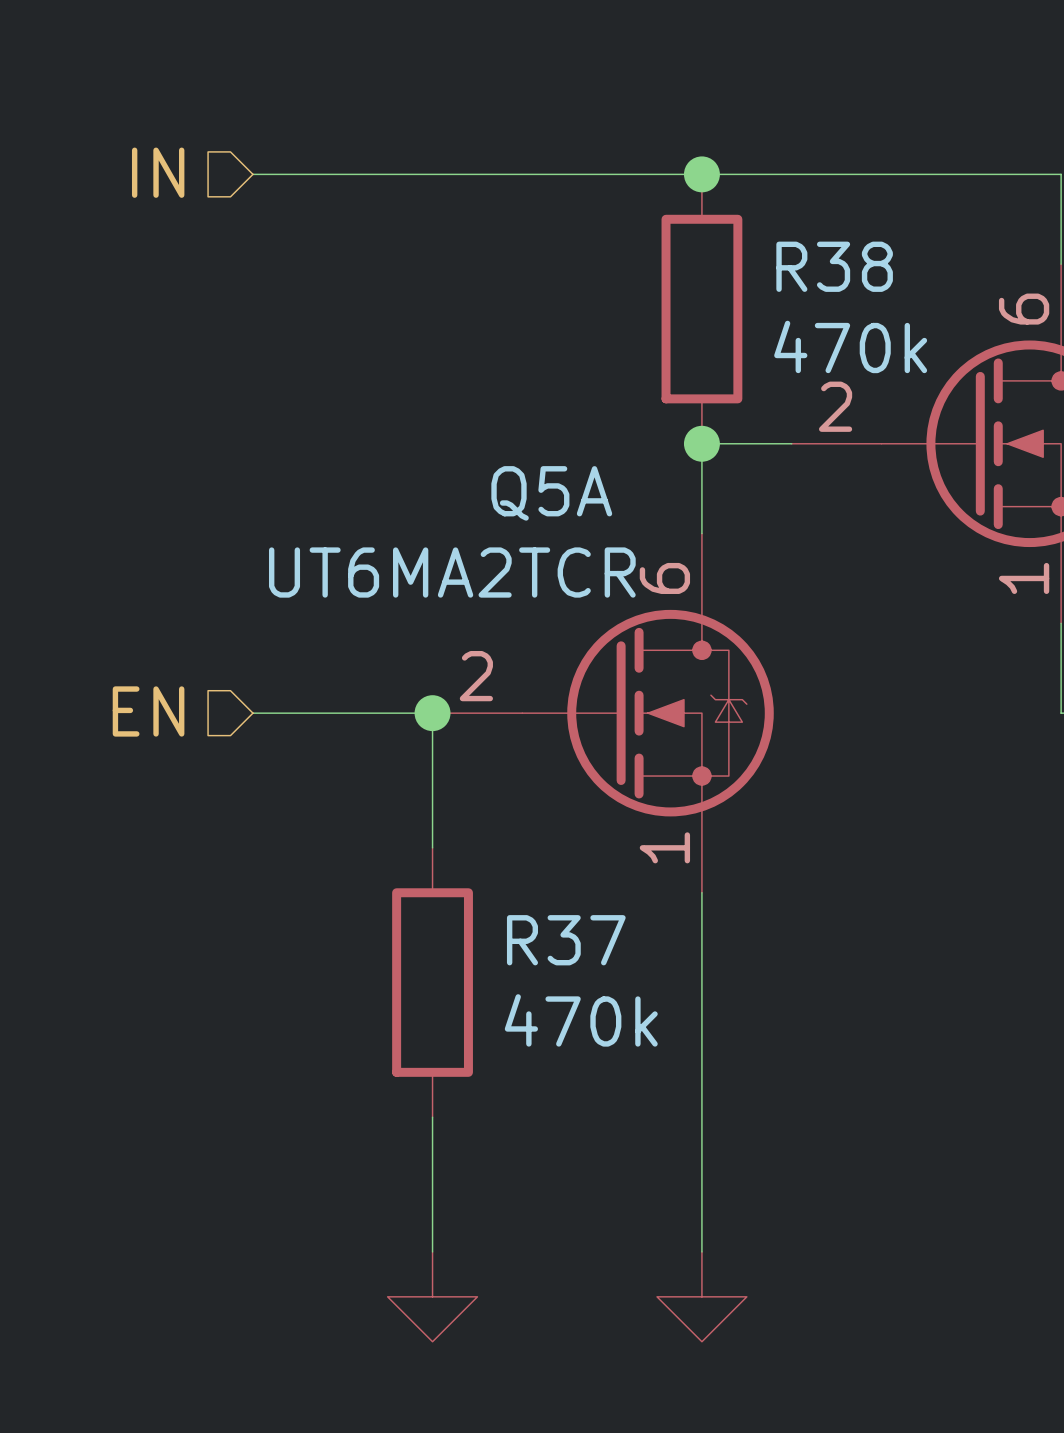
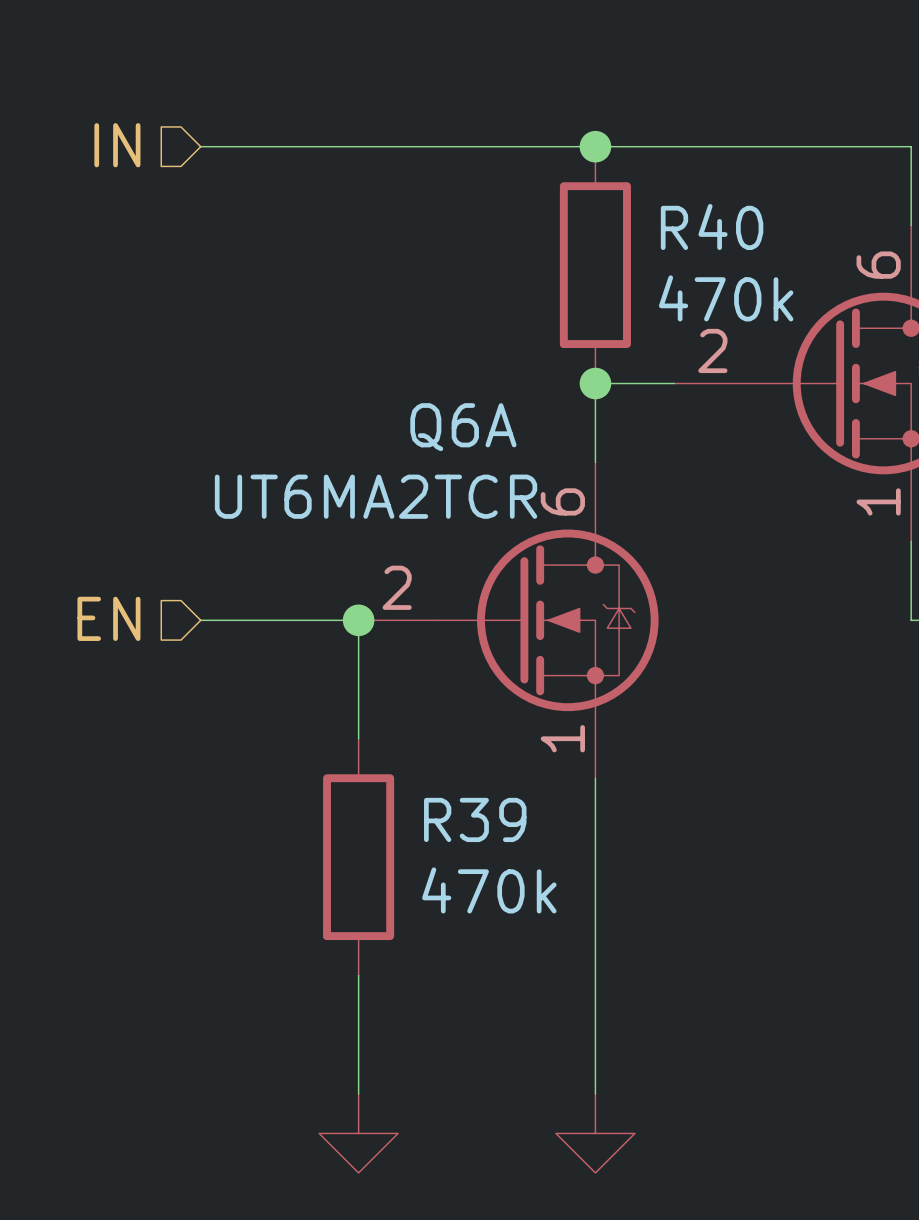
R38 name: R38 (834, 266) -> R40 (712, 226)
Q5A name: Q5A (551, 493) -> Q6A (463, 427)
R37 name: R37 (566, 940) -> R39 (475, 819)

